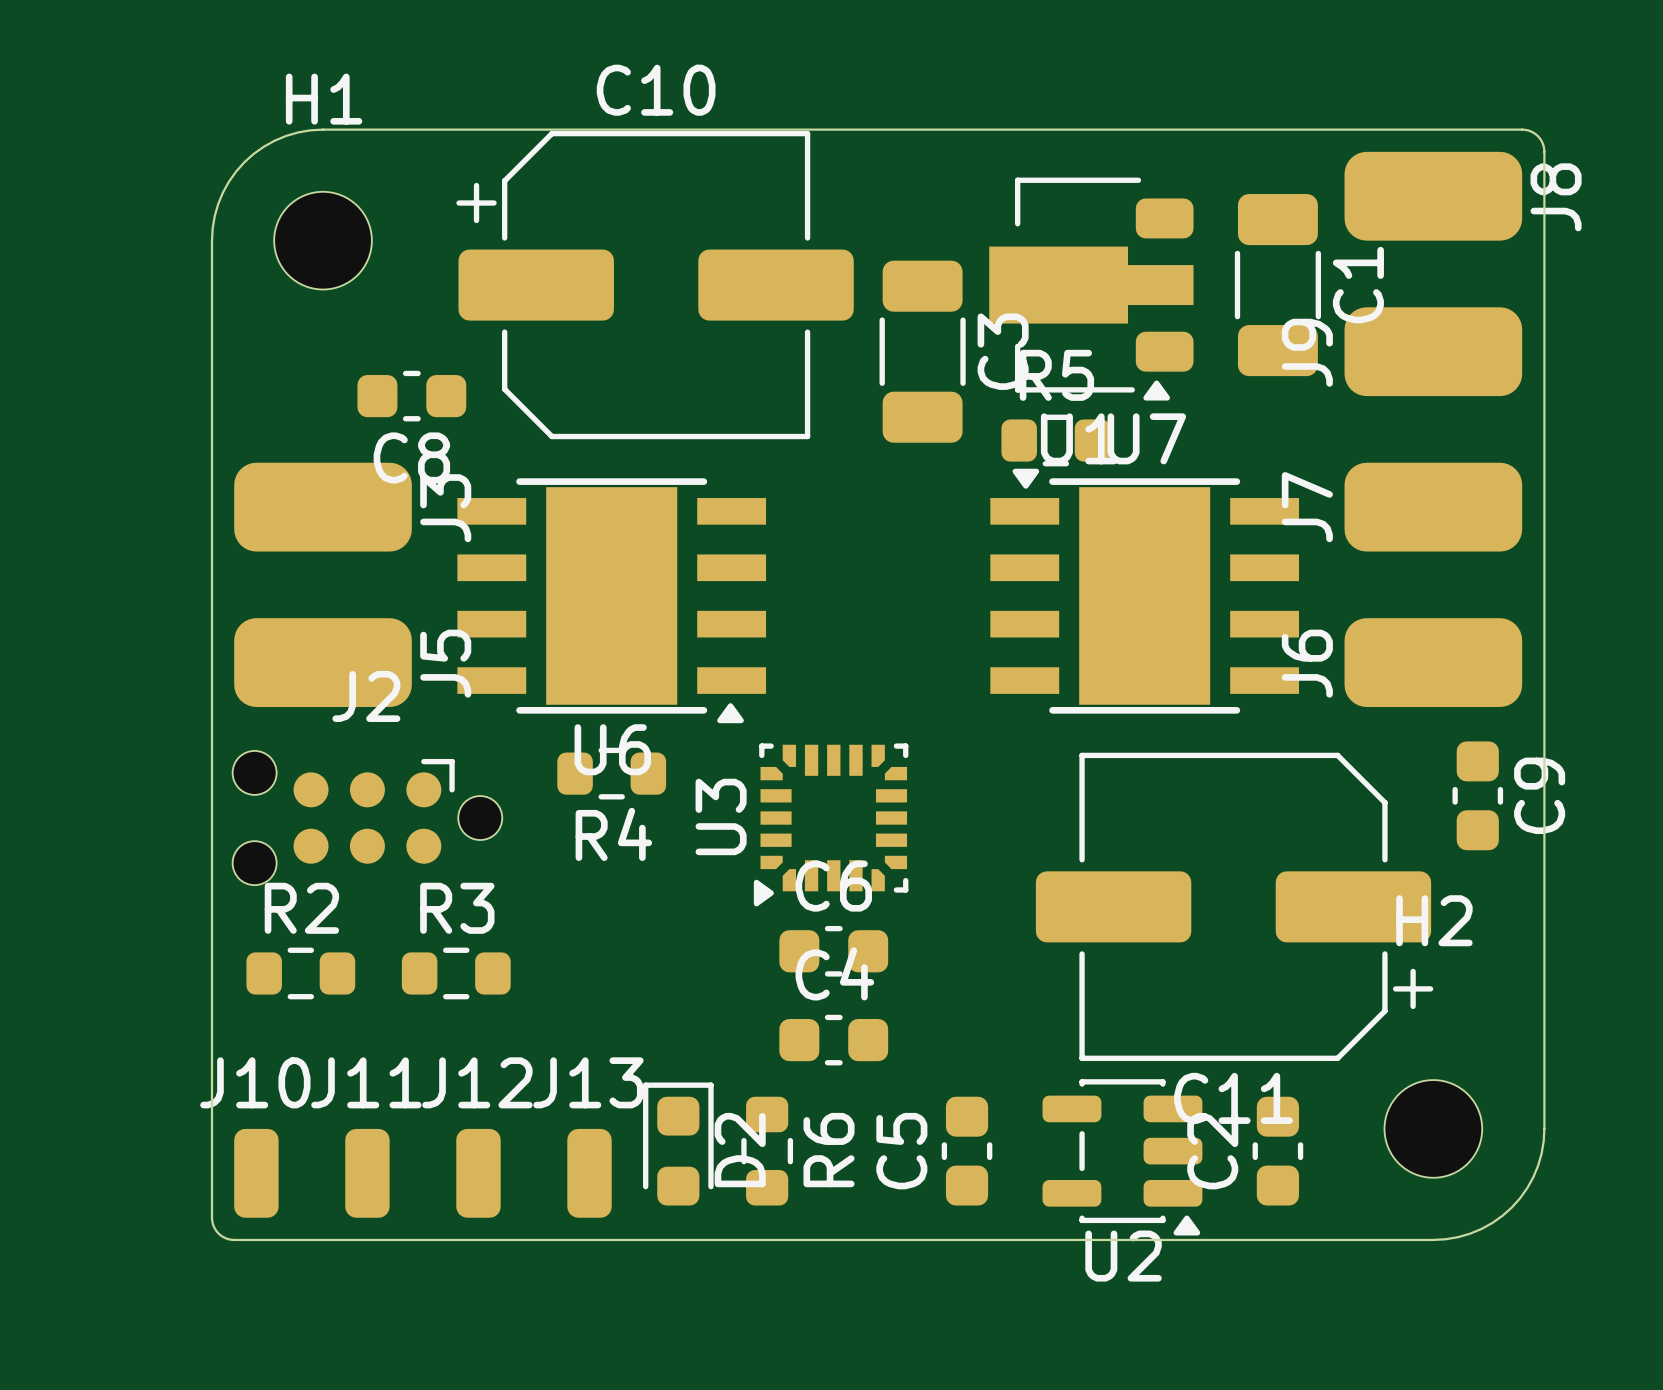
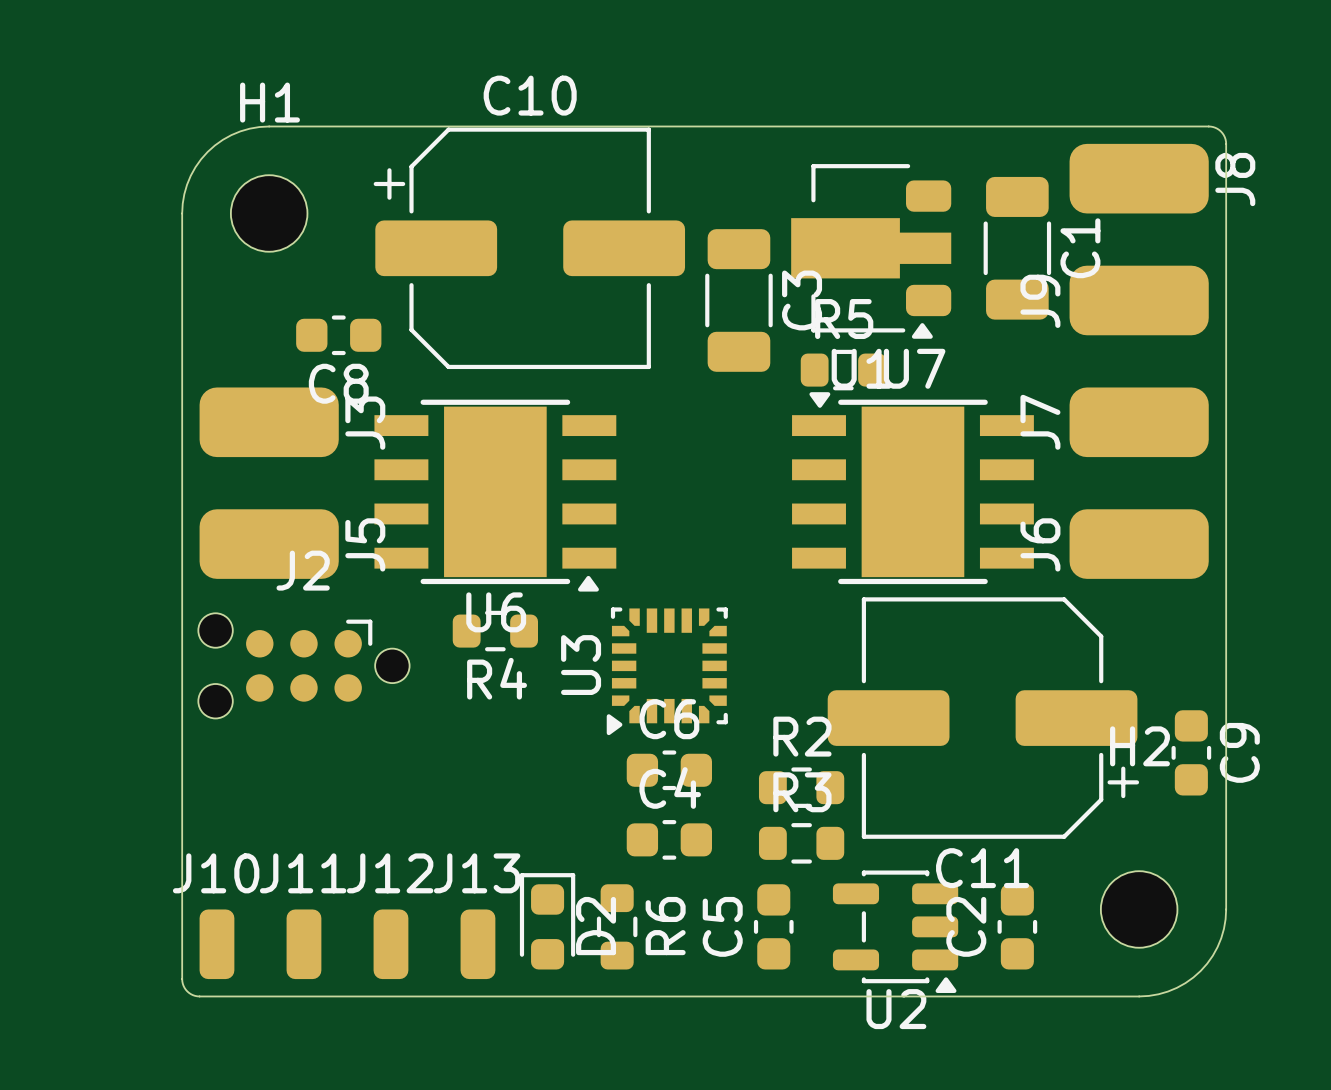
C9 position: (1477, 795) -> (1191, 752)
C11 position: (1234, 906) -> (983, 718)
R2 position: (300, 973) -> (801, 787)
R3 position: (456, 973) -> (801, 843)

